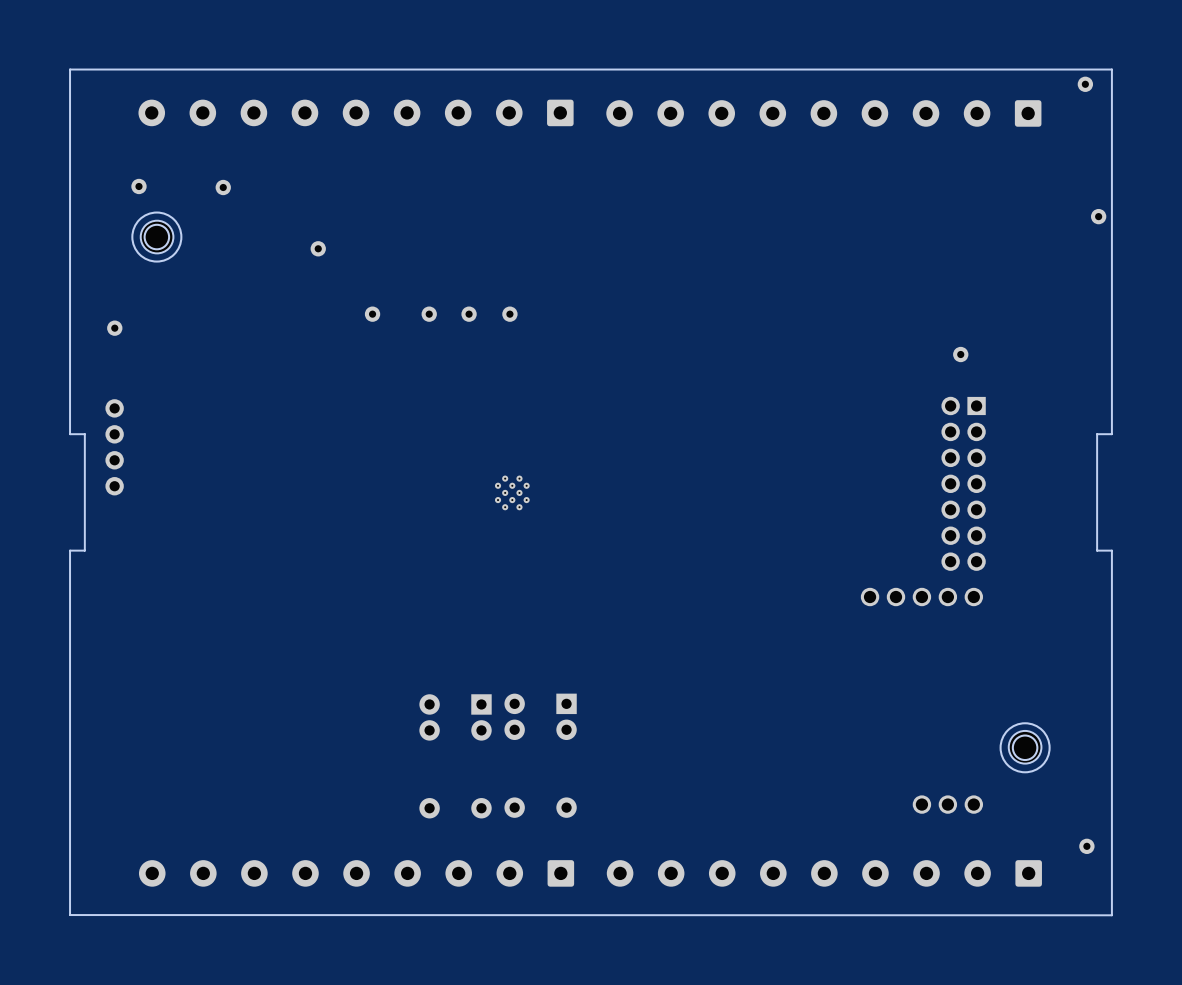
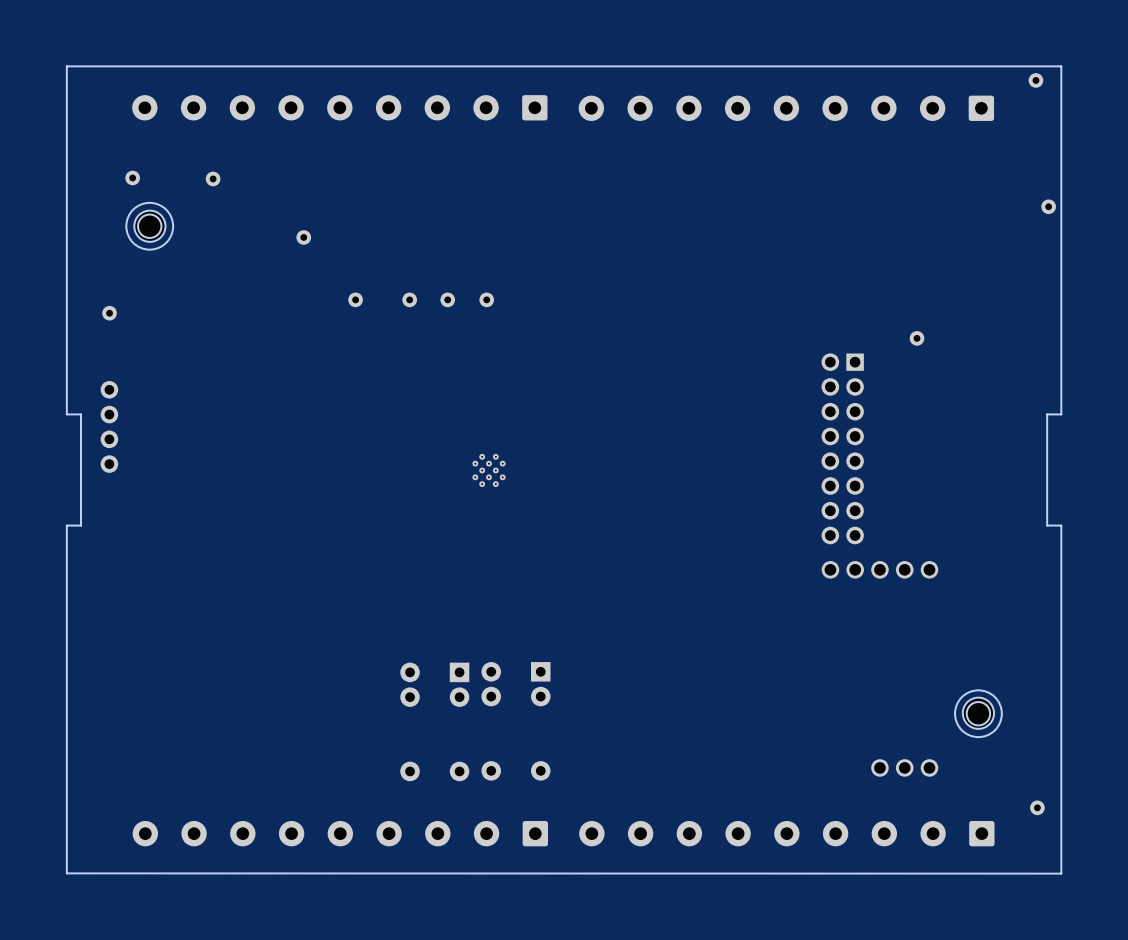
part: none -> (842, 448)
part: (963, 483) -> none

